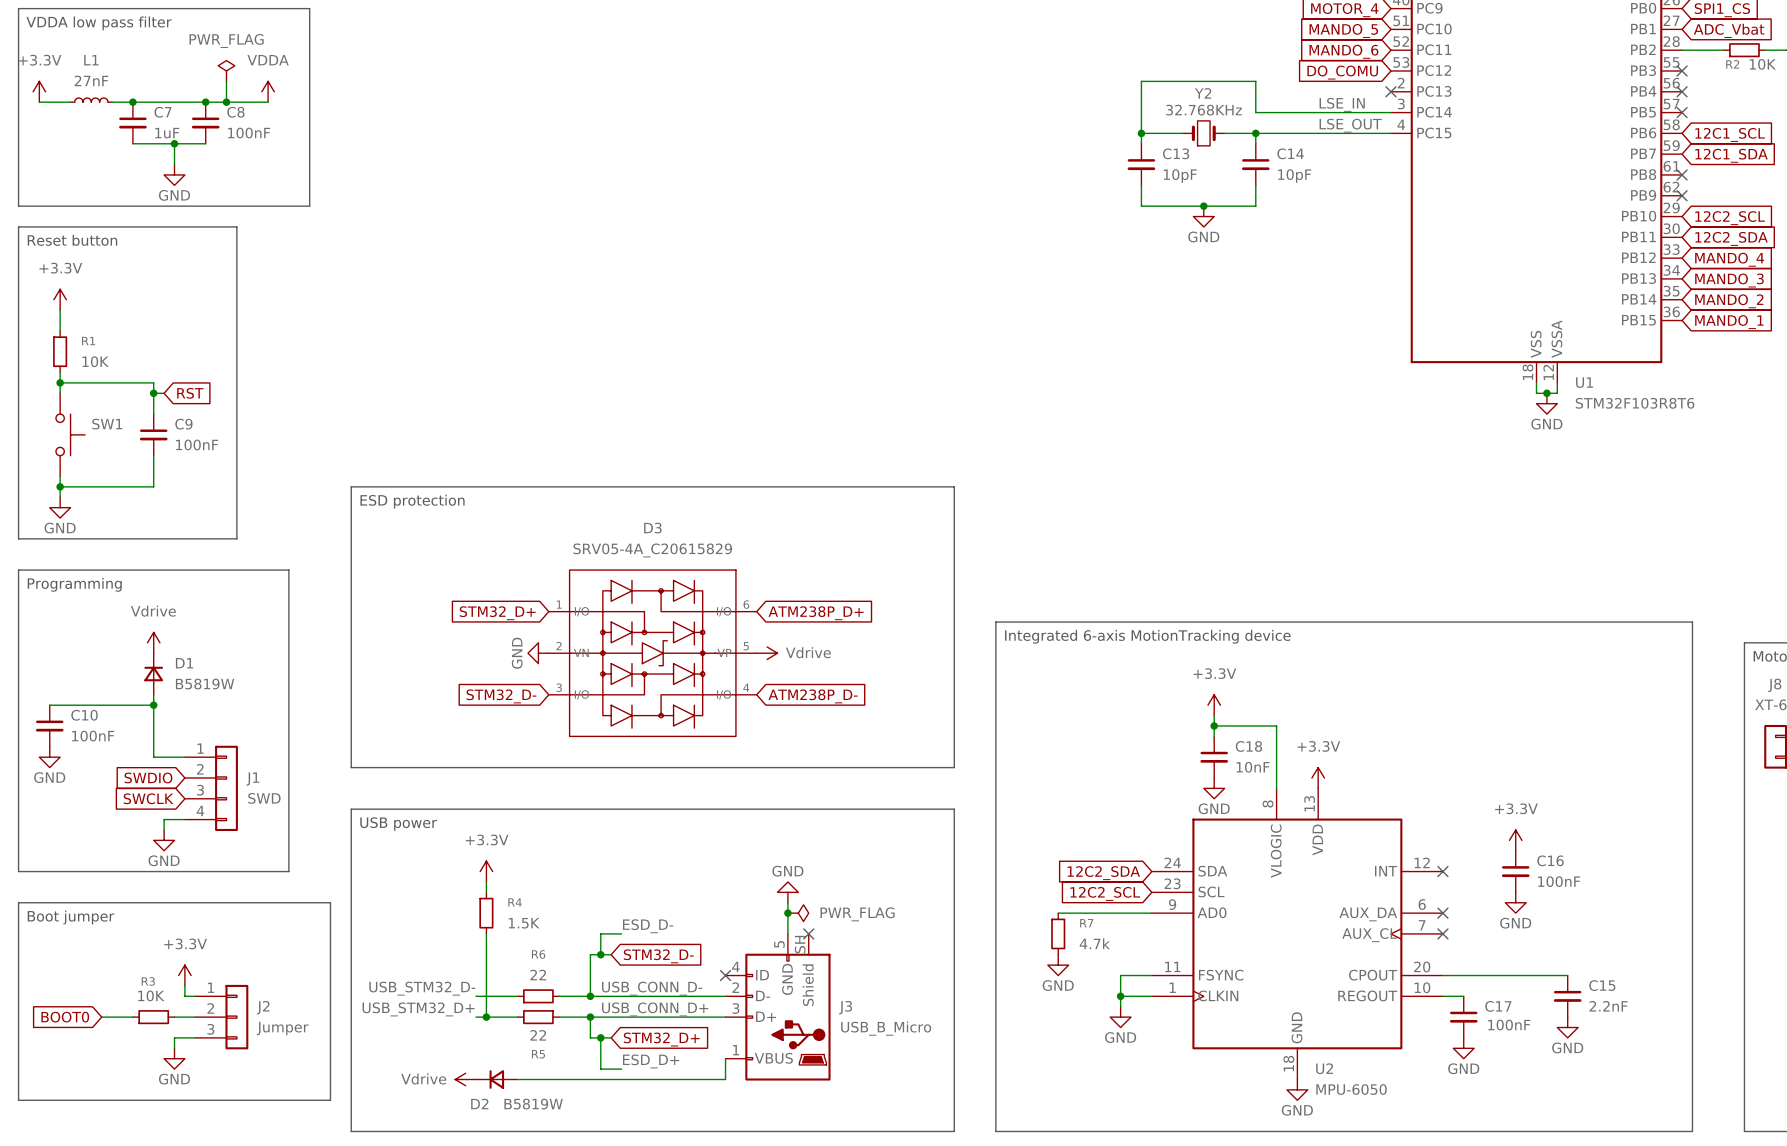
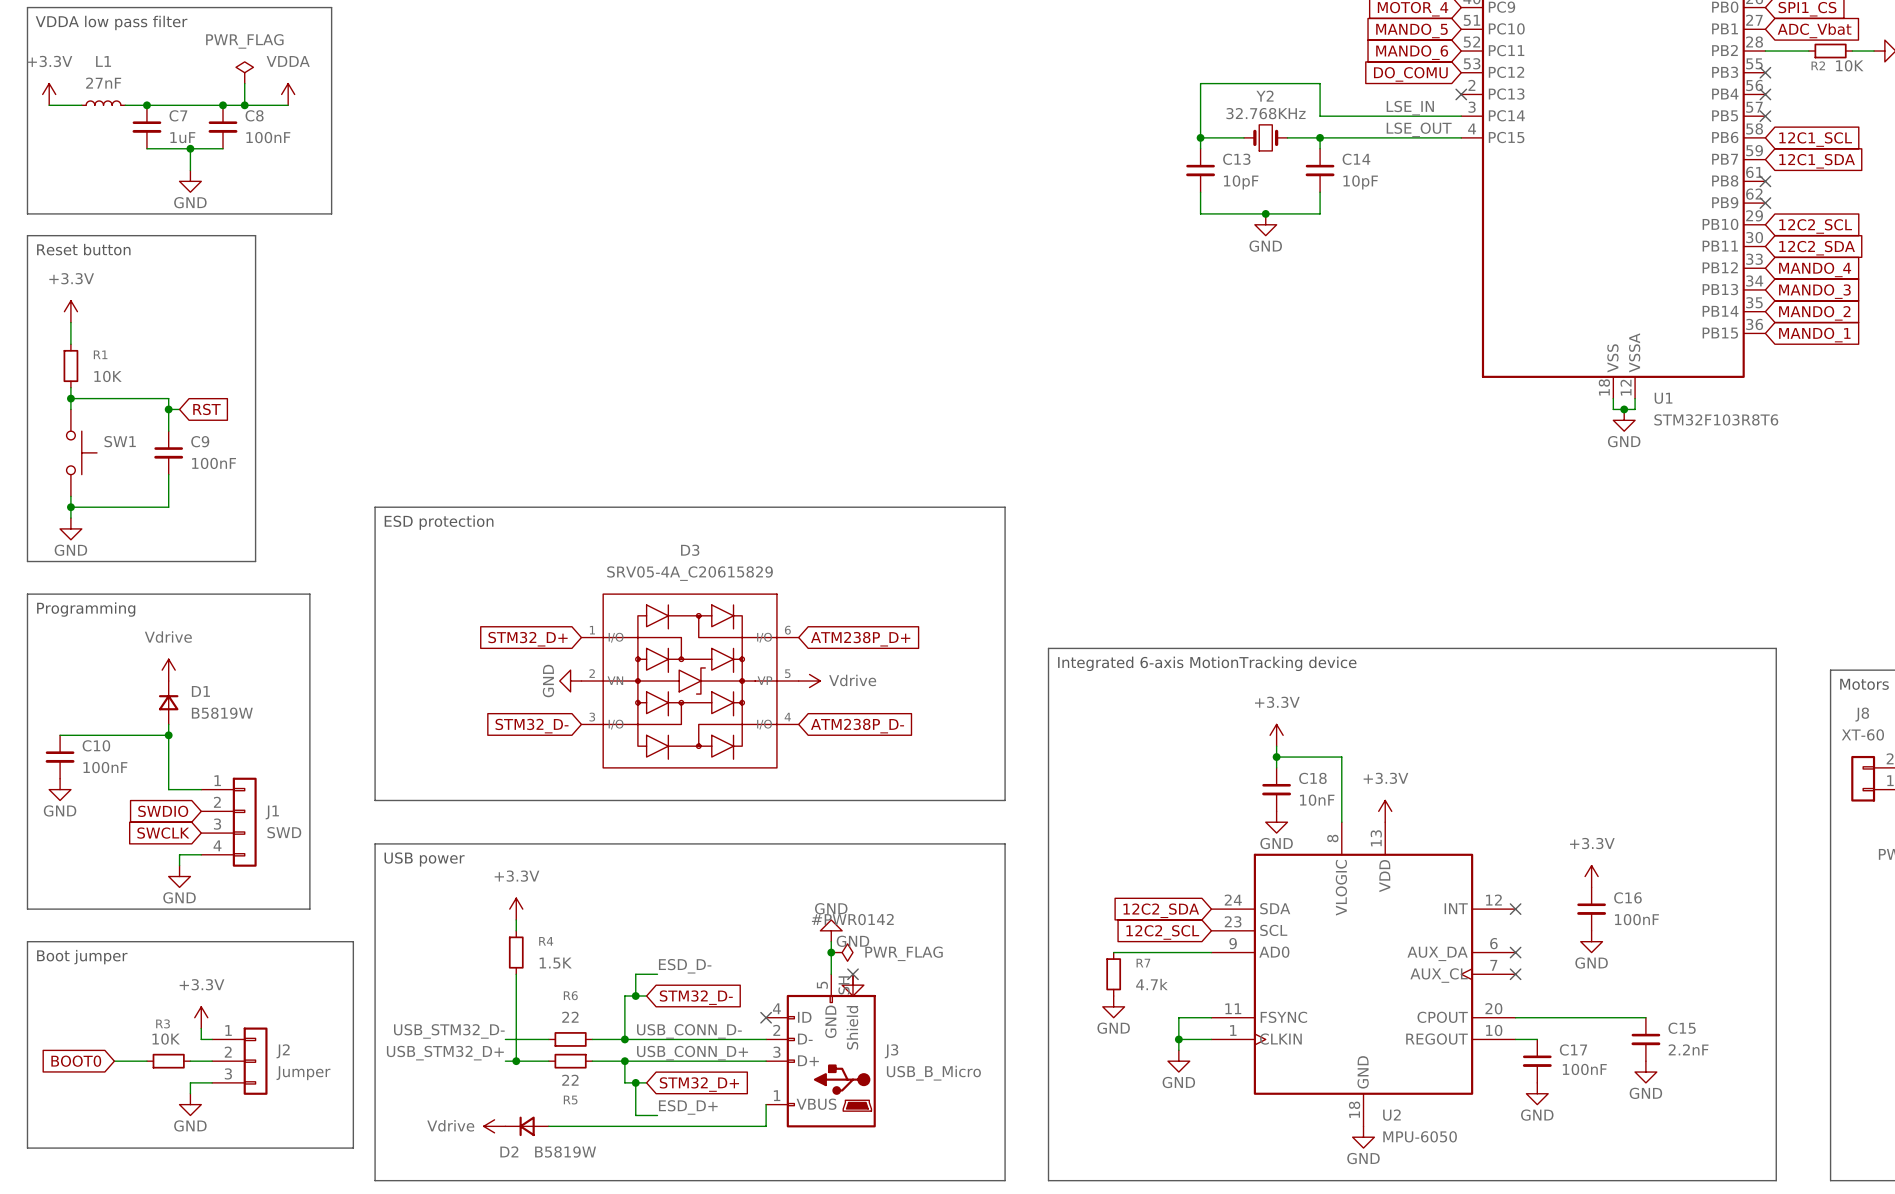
#PWR0142: none -> GND (852, 985)

